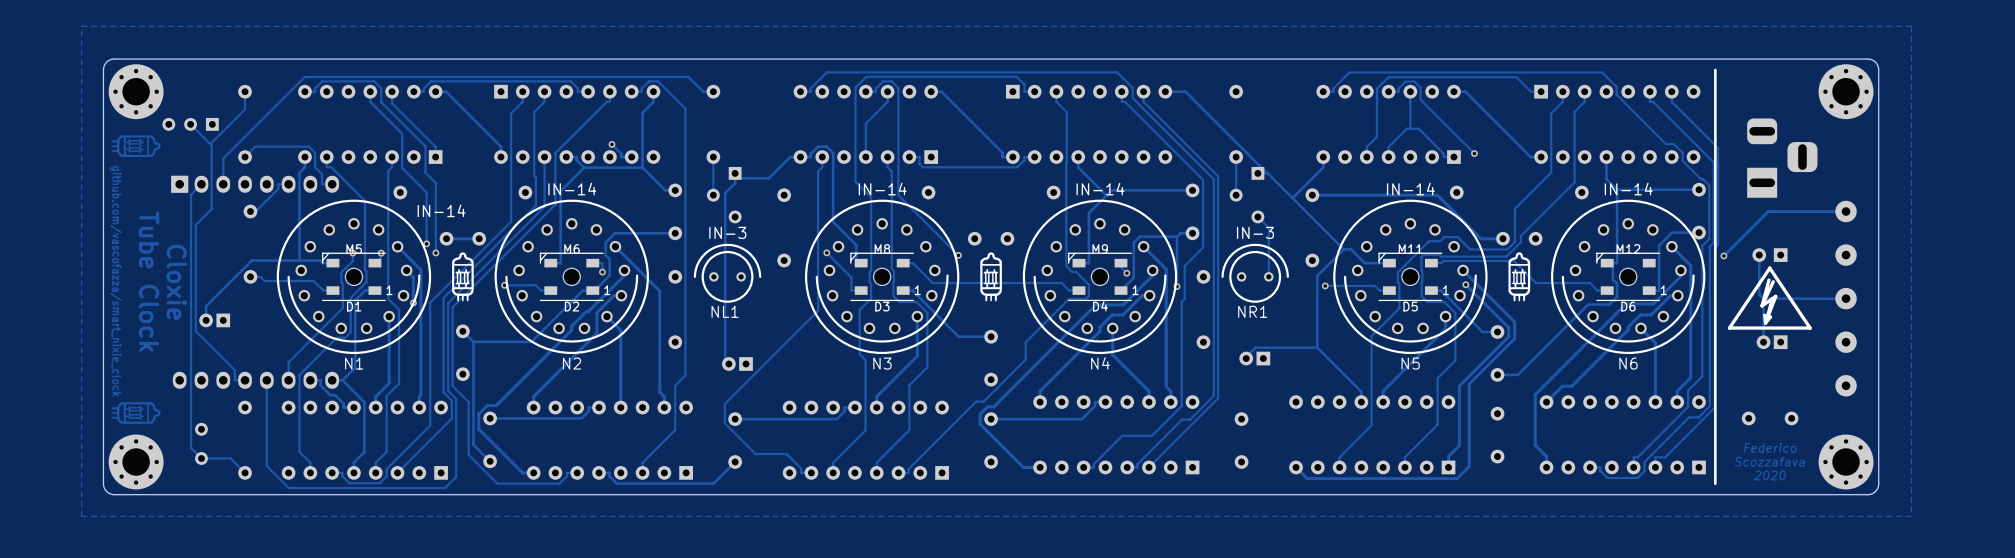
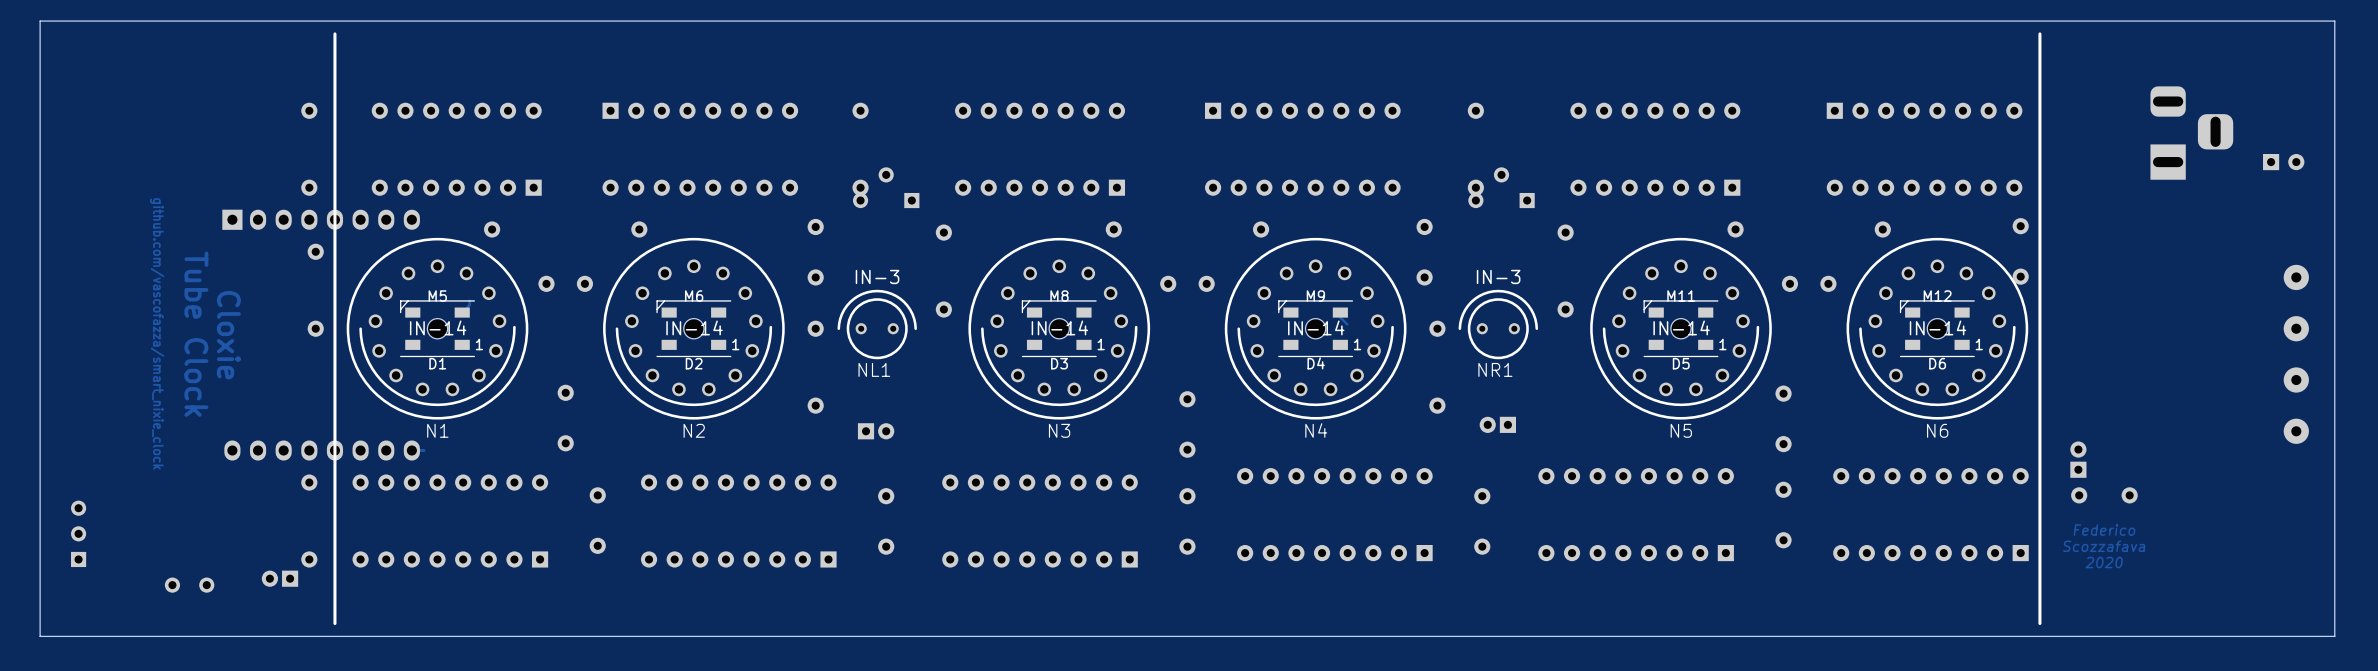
zone outline: (81, 26) (81, 516) (1911, 516) (1911, 26) (81, 26) -> none
line: none -> (334, 33) (334, 623)
line: none -> (2039, 33) (2039, 85)
board edge: (114, 59) (1870, 59) (1876, 63) (1878, 69) (1878, 486) (1874, 492) (1867, 494) (111, 494) (105, 490) (103, 483) (103, 69) (106, 62) (114, 59) -> (40, 21) (40, 636) (2334, 636) (2334, 21) (40, 21)
part: (136, 91) -> none
track: (245, 91) (245, 109) (210, 144) -> none
track: (304, 91) (315, 91) (315, 88) (322, 81) (374, 81) (381, 88) (381, 102) (425, 146) (425, 172) (435, 183) (435, 252) -> none
track: (370, 91) (370, 101) (402, 133) (402, 168) (426, 192) (426, 243) -> none
track: (392, 91) (392, 103) (435, 146) (435, 157) -> none
track: (413, 91) (423, 91) (423, 88) (431, 81) (570, 81) (577, 88) (577, 91) (588, 91) -> none
track: (435, 91) (445, 91) (500, 146) (500, 157) -> none
track: (522, 91) (522, 101) (511, 113) (511, 221) (430, 302) (430, 425) (386, 469) (386, 476) (379, 483) (349, 483) (342, 476) (342, 472) (332, 472) -> none
track: (544, 91) (544, 101) (534, 112) (535, 205) (443, 297) (443, 392) (451, 400) (451, 418) (397, 472) -> none
track: (609, 91) (609, 101) (606, 101) (555, 153) (555, 204) (452, 307) (452, 385) (468, 402) (468, 454) (497, 483) (559, 483) (567, 476) (567, 472) (577, 472) -> none
track: (631, 91) (641, 91) (641, 88) (648, 81) (658, 81) (685, 108) (685, 375) (675, 385) (675, 430) (642, 462) (642, 472) -> none
track: (653, 91) (653, 102) (642, 112) (642, 167) -> none
track: (713, 91) (703, 91) (688, 77) (304, 77) (223, 158) (223, 184) -> none
track: (800, 91) (810, 91) (810, 88) (826, 72) (1117, 72) (1132, 87) (1132, 98) (1213, 179) (1213, 395) (1190, 419) (1182, 419) (1137, 464) (1137, 467) (1127, 467) -> none
track: (865, 91) (875, 91) (875, 88) (883, 81) (891, 81) (898, 88) (898, 195) (958, 255) -> none
track: (887, 91) (887, 101) (865, 123) (865, 157) -> none
track: (931, 91) (941, 91) (1002, 152) (1002, 157) (1012, 157) -> none
track: (1034, 91) (1024, 91) (1024, 84) (1016, 76) (866, 76) (855, 87) (855, 181) (871, 197) (871, 298) (859, 309) (859, 354) (865, 360) (865, 430) (833, 462) (833, 472) -> none
track: (1056, 91) (1056, 101) (1066, 112) (1066, 266) (1072, 271) (1076, 271) (1088, 284) (1088, 296) (1085, 298) (1069, 298) (1025, 342) (1025, 359) (983, 401) (976, 401) (908, 469) (908, 472) (898, 472) -> none
track: (1121, 91) (1121, 101) (1124, 101) (1203, 179) (1203, 247) (1184, 266) (1184, 299) (1181, 302) (1181, 406) (1151, 435) (1122, 435) (1093, 464) (1093, 467) (1083, 467) -> none
track: (1143, 91) (1143, 101) (1218, 176) (1218, 398) (1149, 467) -> none
track: (1165, 91) (1185, 91) (1265, 173) -> none
track: (1323, 91) (1333, 91) (1333, 88) (1349, 72) (1602, 72) (1616, 86) (1616, 94) (1665, 144) (1673, 144) (1682, 152) (1682, 160) (1709, 185) (1709, 238) (1702, 245) (1702, 376) (1688, 390) (1688, 406) (1637, 457) (1633, 457) (1633, 467) -> none
track: (1388, 91) (1398, 91) (1398, 88) (1405, 81) (1414, 81) (1420, 87) (1420, 99) (1474, 153) -> none
track: (1410, 91) (1410, 128) -> none
track: (1453, 91) (1465, 91) (1530, 157) (1541, 157) -> none
track: (1541, 91) (1530, 91) (1516, 77) (1388, 77) (1376, 88) (1376, 136) (1366, 146) (1366, 157) -> none
track: (1562, 91) (1562, 101) (1551, 113) (1551, 172) (1514, 208) (1514, 241) (1507, 249) (1470, 249) (1457, 237) (1444, 237) (1440, 241) (1429, 241) (1397, 272) (1399, 308) (1371, 336) (1371, 425) (1339, 457) (1339, 467) -> none
track: (1584, 91) (1584, 101) (1574, 111) (1574, 182) (1520, 236) (1520, 242) (1506, 256) (1423, 254) (1421, 257) (1421, 296) (1427, 302) (1444, 302) (1455, 313) (1455, 360) (1437, 378) (1437, 424) (1404, 457) (1404, 467) -> none
track: (1650, 91) (1650, 101) (1653, 101) (1713, 162) (1713, 242) (1709, 246) (1709, 406) (1698, 417) (1689, 417) (1644, 461) (1644, 471) (1637, 478) (1607, 478) (1600, 470) (1600, 467) (1590, 467) -> none
track: (1671, 91) (1671, 101) (1718, 148) (1718, 244) (1714, 248) (1714, 407) (1665, 457) (1655, 457) (1655, 467) -> none
part: (1846, 91) -> none
track: (190, 124) (210, 144) -> none
part: (190, 124) -> none
drawing: [111, 135, 161, 158] -> none
track: (210, 144) (211, 209) (195, 224) (195, 331) (234, 370) (234, 380) (245, 380) -> none
track: (611, 144) (621, 153) (621, 157) (631, 157) -> none
via: (611, 144) -> none
via: (1474, 153) -> none
track: (245, 157) (255, 146) (308, 146) (315, 152) (315, 167) (322, 174) (322, 184) (332, 184) -> none
track: (304, 157) (304, 167) (299, 172) (299, 260) -> none
track: (326, 157) (326, 167) (331, 167) (364, 200) (366, 282) (350, 298) (350, 332) (345, 337) (336, 337) (299, 374) (299, 451) (310, 462) (310, 472) -> none
track: (392, 157) (392, 167) (388, 171) (388, 298) (399, 309) (399, 383) (386, 396) (386, 451) (375, 462) (375, 472) -> none
track: (544, 157) (544, 206) (448, 303) (448, 390) (456, 398) (456, 477) (445, 488) (288, 488) (266, 466) (266, 380) -> none
track: (566, 157) (576, 157) (576, 160) (584, 167) -> none
track: (713, 157) (713, 195) -> none
track: (822, 157) (822, 167) (818, 171) (818, 310) (724, 404) (724, 423) (755, 454) (786, 454) (801, 468) (801, 472) (811, 472) -> none
track: (887, 157) (887, 167) (891, 171) (893, 296) (899, 302) (916, 302) (927, 312) (927, 367) (909, 385) (909, 430) (876, 462) (876, 472) -> none
track: (909, 157) (919, 157) (919, 164) (922, 167) (1017, 167) (1024, 160) (1024, 157) (1034, 157) -> none
track: (1078, 157) (1078, 167) (1106, 195) -> none
track: (1236, 157) (1236, 195) -> none
track: (1323, 157) (1323, 167) (1292, 198) -> none
track: (1388, 157) (1388, 146) (1406, 128) (1418, 128) (1443, 153) (1443, 157) (1453, 157) -> none
track: (1606, 157) (1606, 179) (1617, 189) -> none
part position: (1782, 158) -> (2191, 133)
track: (584, 167) (642, 167) -> none
track: (584, 167) (560, 191) (560, 263) (550, 263) -> none
track: (642, 167) (665, 190) (675, 190) -> none
track: (735, 173) (735, 183) (725, 193) (725, 360) (728, 363) -> none
track: (1257, 173) (1267, 173) (1343, 249) -> none
track: (735, 178) (768, 178) (790, 157) (810, 157) (810, 153) (818, 146) (826, 146) (833, 153) (833, 221) (856, 245) (856, 263) (861, 263) -> none
track: (201, 184) (191, 194) (191, 448) (201, 458) (230, 458) (245, 472) -> none
track: (288, 184) (278, 184) (278, 188) (255, 211) (250, 211) -> none
N2 value position: IN-14 (572, 189) -> IN-14 (694, 327)
N3 value position: IN-14 (882, 189) -> IN-14 (1059, 327)
N4 value position: IN-14 (1100, 189) -> IN-14 (1316, 327)
N5 value position: IN-14 (1410, 189) -> IN-14 (1681, 327)
track: (1617, 189) (1617, 263) (1607, 263) -> none
track: (1617, 189) (1699, 189) -> none
N6 value position: IN-14 (1628, 189) -> IN-14 (1937, 327)
track: (1192, 190) (1111, 190) (1088, 213) (1088, 263) (1078, 263) -> none
part rotation: 0° (724, 195) -> 90° clockwise (886, 187)
part position: (724, 195) -> (886, 187)
part rotation: 0° (1247, 195) -> 90° clockwise (1501, 187)
part position: (1247, 195) -> (1501, 187)
track: (1312, 195) (1437, 195) (1480, 238) (1502, 238) -> none
N1 value position: IN-14 (441, 210) -> IN-14 (438, 327)
track: (1846, 211) (1768, 211) (1723, 255) -> none
part: (1846, 211) -> none
track: (1257, 216) (1268, 227) (1268, 276) -> none
track: (1699, 232) (1672, 232) (1659, 245) (1659, 290) (1649, 290) -> none
track: (675, 233) (614, 233) (605, 242) (605, 255) (609, 259) (609, 275) (594, 290) (582, 290) (531, 341) (473, 341) -> none
track: (1192, 233) (1180, 233) (1177, 236) -> none
part: none -> (2296, 277)
track: (1177, 236) (1177, 286) -> none
track: (1177, 236) (1139, 236) (1133, 242) (1133, 277) (1121, 290) -> none
track: (446, 238) (479, 238) -> none
via: (426, 243) -> none
track: (397, 246) (420, 270) (419, 407) -> none
track: (615, 246) (659, 291) (659, 392) (664, 396) (664, 407) -> none
track: (1143, 246) (1166, 269) (1166, 386) (1170, 391) (1170, 402) -> none
track: (1671, 246) (1690, 265) (1690, 377) (1677, 391) (1677, 402) -> none
track: (1343, 249) (1317, 275) (1317, 347) -> none
track: (1343, 249) (1351, 249) (1364, 263) (1389, 263) -> none
via: (435, 252) -> none
drawing: [452, 252, 474, 302] -> none
track: (826, 252) (851, 277) (851, 290) (861, 290) -> none
via: (826, 252) -> none
drawing: [980, 252, 1002, 302] -> none
drawing: [1508, 252, 1531, 302] -> none
track: (352, 253) (352, 261) (341, 272) (342, 308) (288, 362) (288, 380) -> none
via: (352, 253) -> none
via: (381, 253) -> none
via: (958, 255) -> none
via: (1723, 255) -> none
track: (1759, 255) (1759, 294) (1763, 298) -> none
part rotation: 0° (1769, 255) -> 180° (2283, 162)
part position: (1769, 255) -> (2283, 162)
part: (1846, 255) -> none
track: (332, 263) (323, 263) (320, 260) (251, 260) (206, 306) (206, 320) -> none
track: (592, 263) (602, 263) (602, 272) -> none
track: (903, 263) (912, 263) (932, 283) (1061, 283) (1069, 290) (1078, 290) -> none
track: (1431, 263) (1441, 263) (1443, 260) (1513, 260) (1536, 283) (1589, 283) (1597, 290) (1607, 290) -> none
track: (1612, 263) (1612, 279) (1617, 283) (1617, 296) (1609, 304) (1588, 304) (1517, 374) (1497, 374) -> none
drawing: [1727, 266, 1812, 330] -> none
track: (406, 270) (413, 277) (413, 302) -> none
track: (624, 270) (624, 275) (571, 326) (571, 330) (496, 405) (487, 405) (478, 414) (478, 428) (522, 472) (533, 472) -> none
track: (1152, 270) (1152, 275) (1123, 304) (1095, 304) (993, 406) (987, 406) (980, 414) (980, 424) (1023, 467) (1040, 467) -> none
track: (1463, 270) (1514, 322) (1514, 338) (1469, 384) (1469, 466) (1457, 478) (1307, 478) (1296, 467) -> none
track: (1680, 270) (1680, 276) (1653, 303) (1625, 303) (1535, 394) (1535, 445) (1546, 456) (1546, 467) -> none
via: (602, 272) -> none
via: (1126, 273) -> none
track: (250, 276) (260, 276) (264, 281) (313, 281) (323, 290) (332, 290) -> none
part: none -> (2296, 328)
track: (1465, 284) (1508, 327) (1508, 336) (1459, 386) (1459, 445) (1448, 456) (1448, 467) -> none
via: (1465, 284) -> none
track: (504, 285) (535, 285) (541, 290) (550, 290) -> none
via: (504, 285) -> none
track: (1325, 285) (1375, 285) (1379, 290) (1389, 290) -> none
via: (1325, 285) -> none
via: (1177, 286) -> none
track: (374, 290) (365, 290) (355, 300) (355, 367) (342, 380) (364, 402) (364, 452) (353, 462) (353, 472) -> none
track: (903, 290) (913, 290) (958, 336) (991, 336) -> none
track: (1431, 290) (1441, 290) (1482, 332) (1497, 332) -> none
track: (621, 295) (613, 295) (596, 312) (596, 333) (533, 396) (533, 407) -> none
track: (1149, 295) (1142, 295) (1122, 315) (1112, 315) (1100, 327) (1100, 331) (1040, 391) (1040, 402) -> none
track: (1677, 295) (1670, 295) (1651, 314) (1640, 314) (1628, 327) (1628, 329) (1571, 386) (1562, 386) (1546, 402) -> none
track: (1763, 298) (1846, 298) -> none
track: (1763, 298) (1763, 342) -> none
part: (1846, 298) -> none
via: (413, 302) -> none
track: (389, 316) (389, 383) (375, 396) (375, 407) -> none
track: (606, 316) (620, 330) (620, 407) -> none
track: (917, 316) (917, 355) (876, 396) (876, 407) -> none
track: (1445, 316) (1445, 328) (1383, 391) (1383, 402) -> none
part position: (214, 320) -> (280, 578)
part: none -> (2296, 380)
track: (1112, 328) (1112, 354) (1149, 391) (1149, 402) -> none
track: (1640, 328) (1655, 342) (1655, 402) -> none
track: (462, 331) (473, 341) -> none
track: (473, 341) (473, 444) (490, 461) -> none
part rotation: 0° (1772, 342) -> 90° clockwise (2078, 459)
part position: (1772, 342) -> (2078, 459)
part: (1846, 342) -> none
track: (1317, 347) (1255, 347) (1246, 358) -> none
track: (1317, 347) (1361, 391) (1361, 402) -> none
part rotation: 0° (737, 363) -> 180° (876, 431)
part: none -> (2296, 431)
track: (310, 380) (320, 380) (320, 385) (330, 395) (335, 395) (343, 403) (343, 407) (353, 407) -> none
part: (1846, 385) -> none
drawing: [111, 402, 161, 424] -> none
track: (1105, 402) (1095, 402) (1095, 405) (1081, 419) (991, 419) -> none
track: (599, 407) (588, 407) (588, 411) (581, 418) (490, 418) -> none
track: (854, 407) (844, 407) (844, 411) (836, 419) (735, 419) -> none
part rotation: 0° (201, 443) -> 90° clockwise (189, 585)
part position: (201, 443) -> (189, 585)
part: none -> (78, 533)
part: (136, 462) -> none
track: (735, 462) (713, 483) (616, 483) (609, 476) (609, 472) (599, 472) -> none
part: (1846, 462) -> none
line: none -> (2039, 572) (2039, 623)

